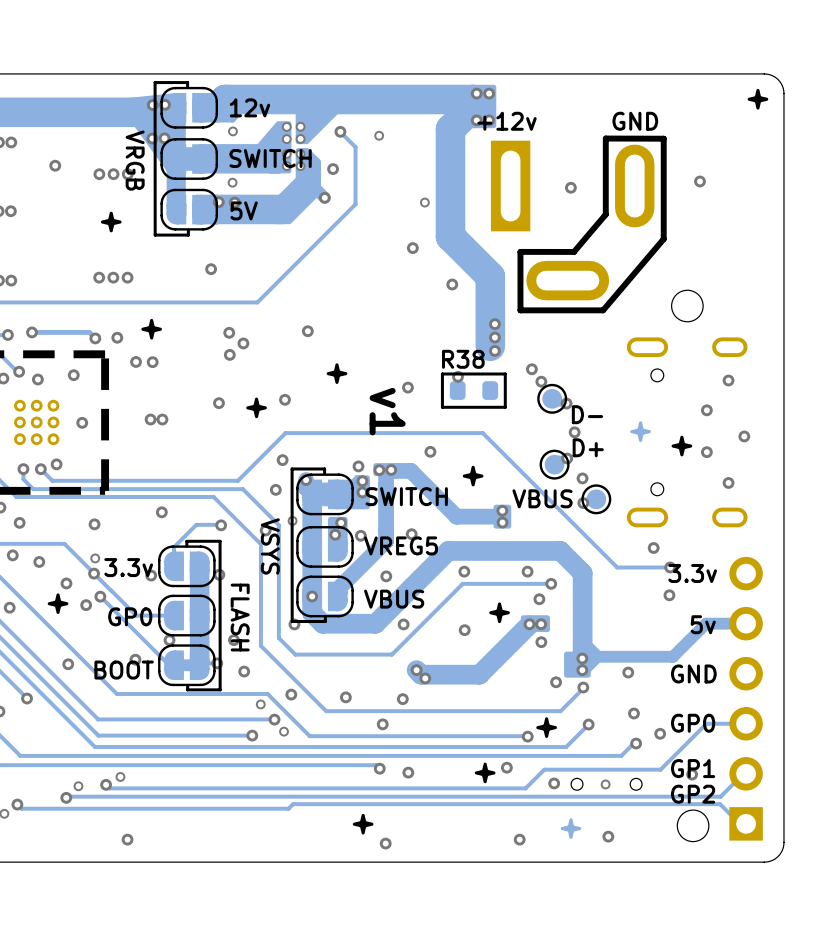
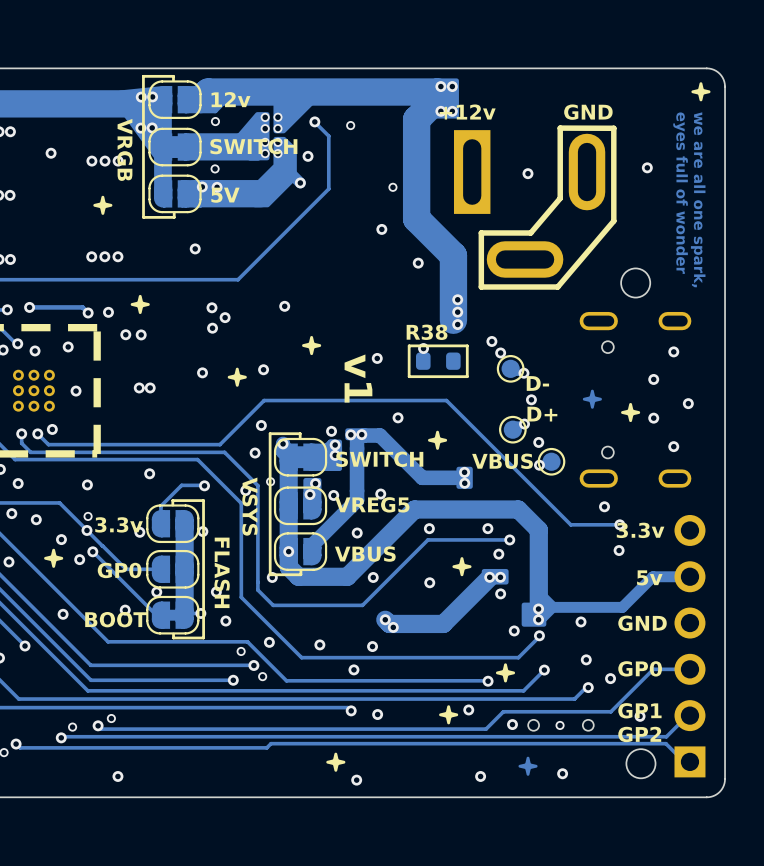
text: none -> eyes full of wonder (680, 193)
text: none -> we are all one spark, (698, 199)

